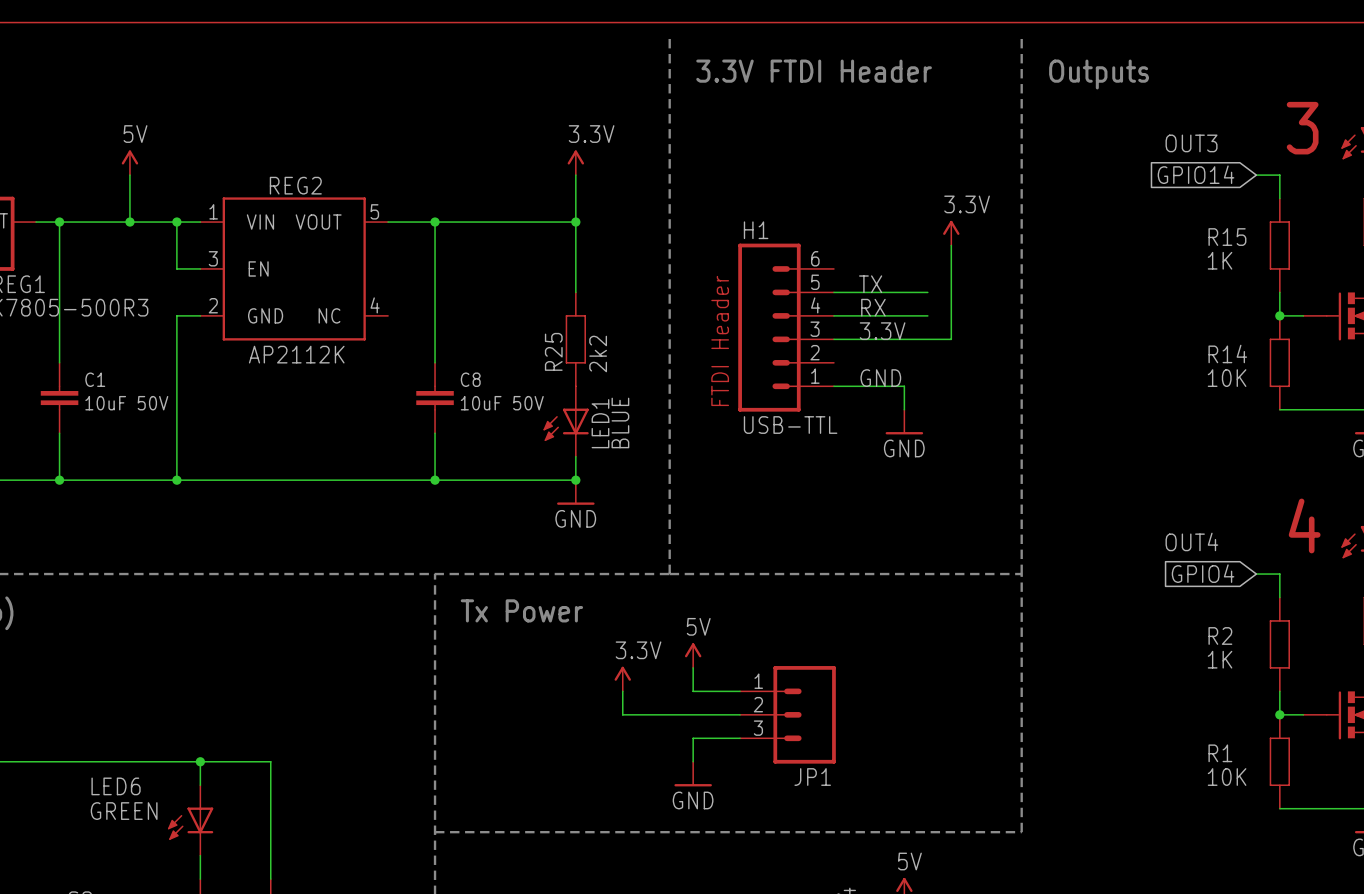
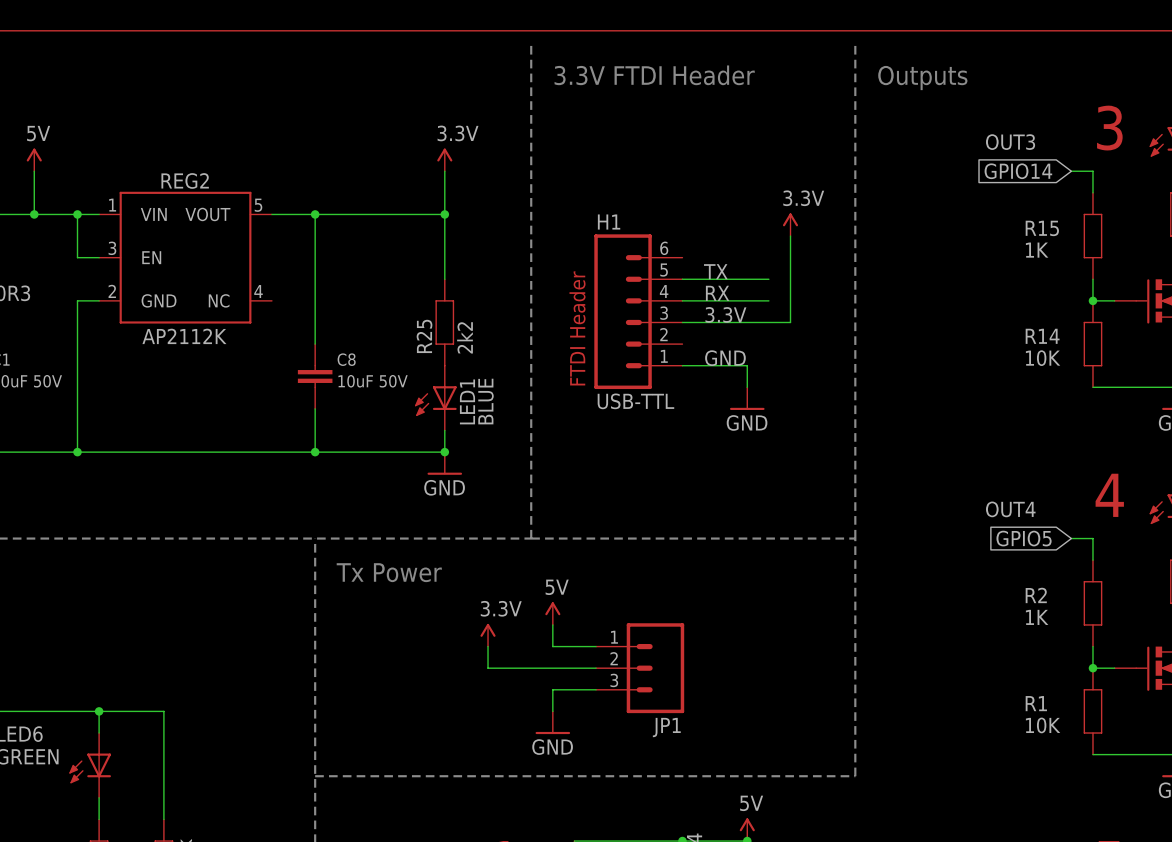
global label: GPIO4 (1203, 573) -> GPIO5 (1024, 538)

